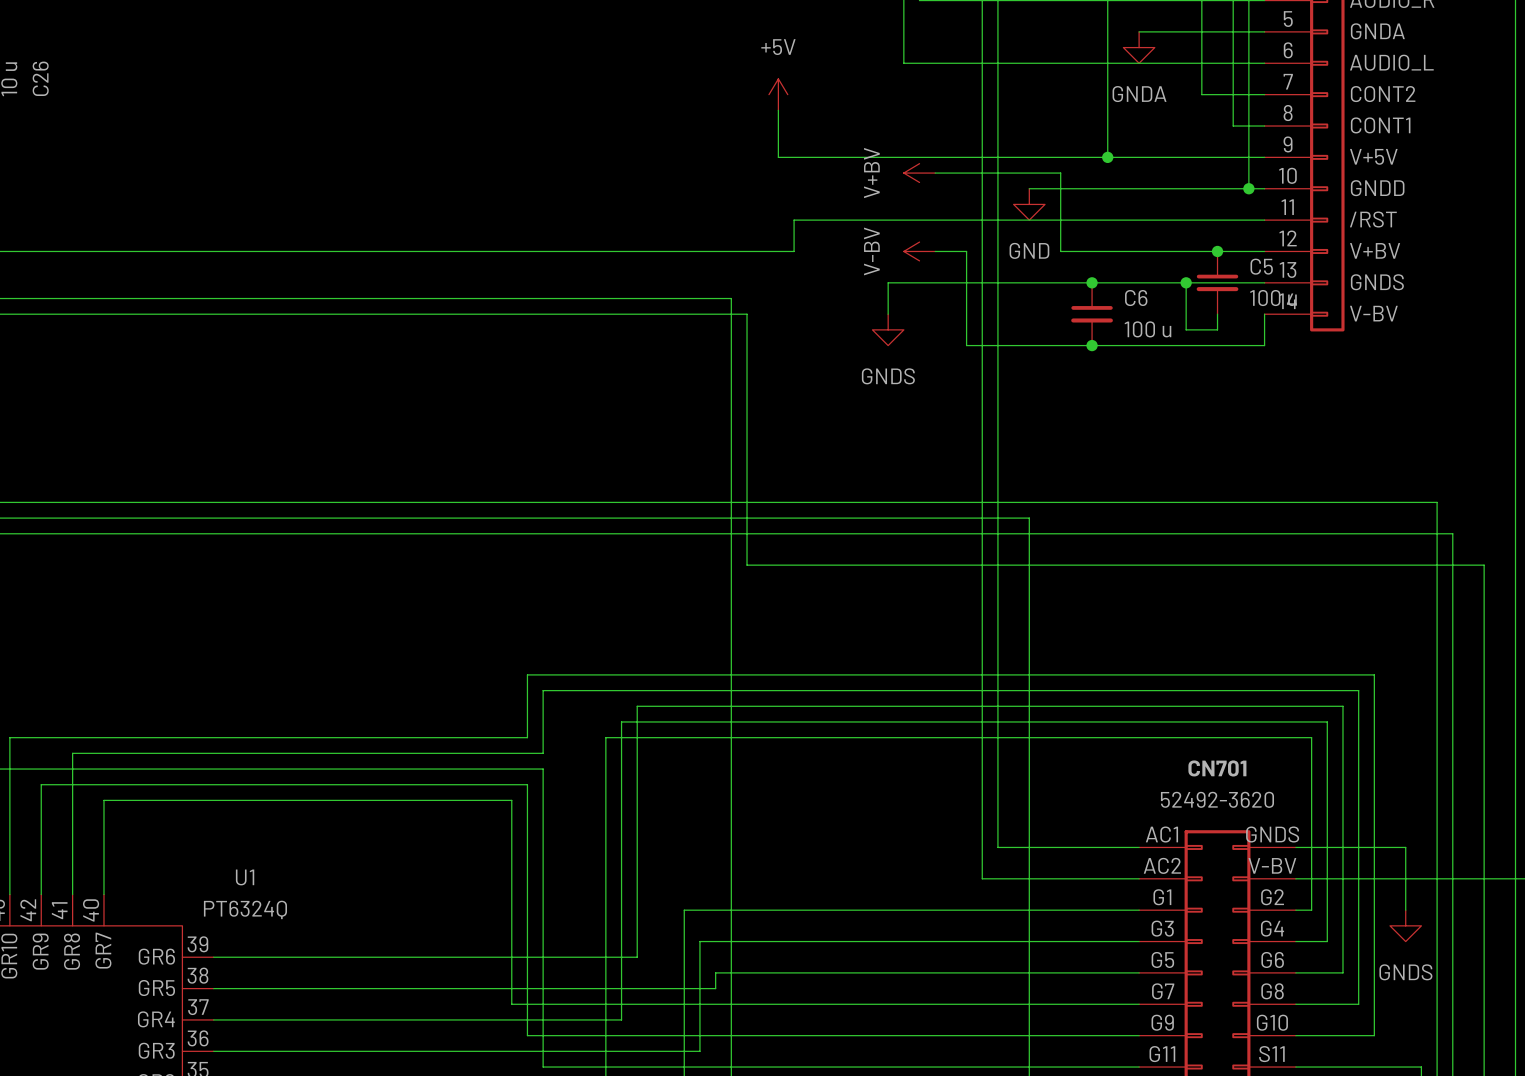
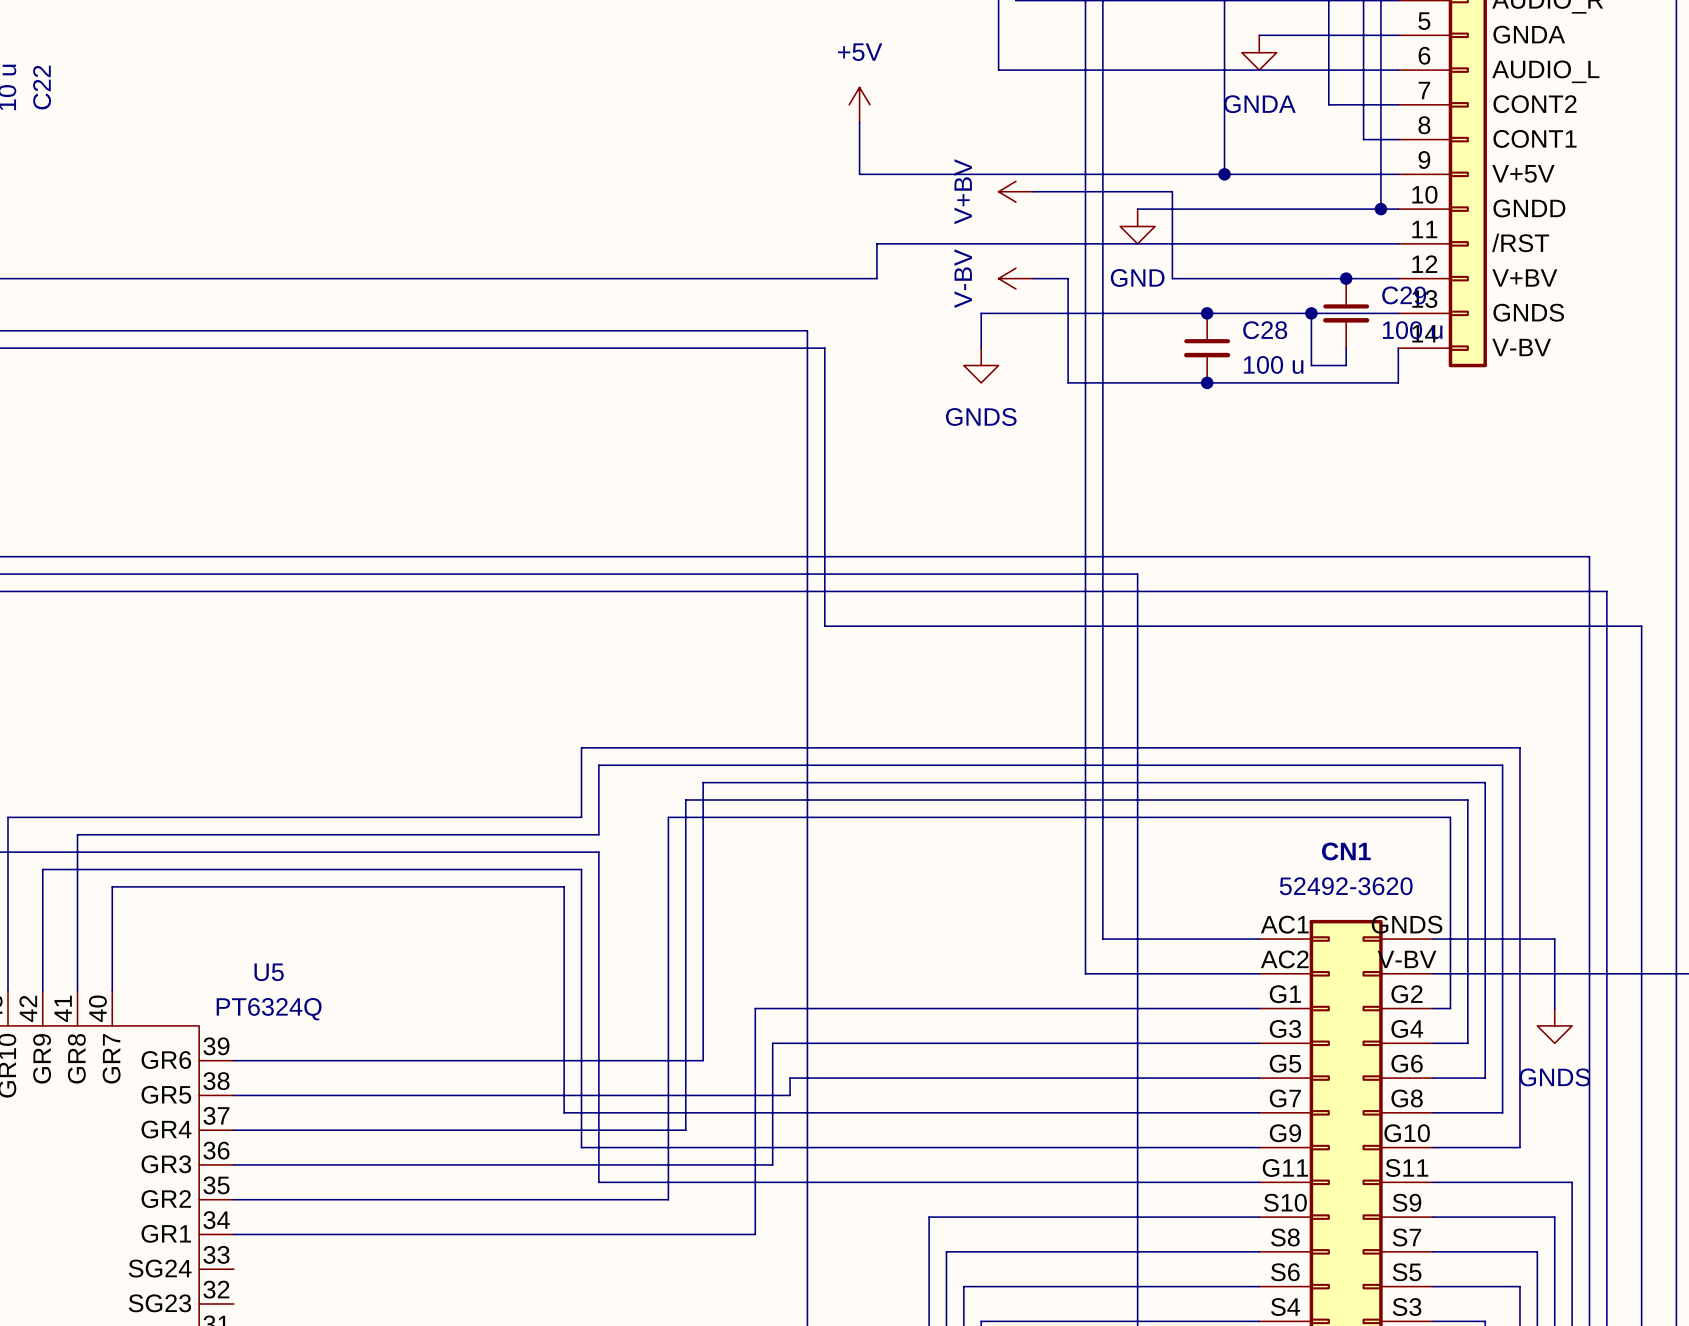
C26 name: C26 (40, 78) -> C22 (42, 87)
C5 name: C5 (1261, 266) -> C29 (1404, 295)
C6 name: C6 (1136, 298) -> C28 (1265, 330)
CN701 name: CN701 (1217, 768) -> CN1 (1346, 851)
U1 name: U1 (245, 877) -> U5 (269, 972)

